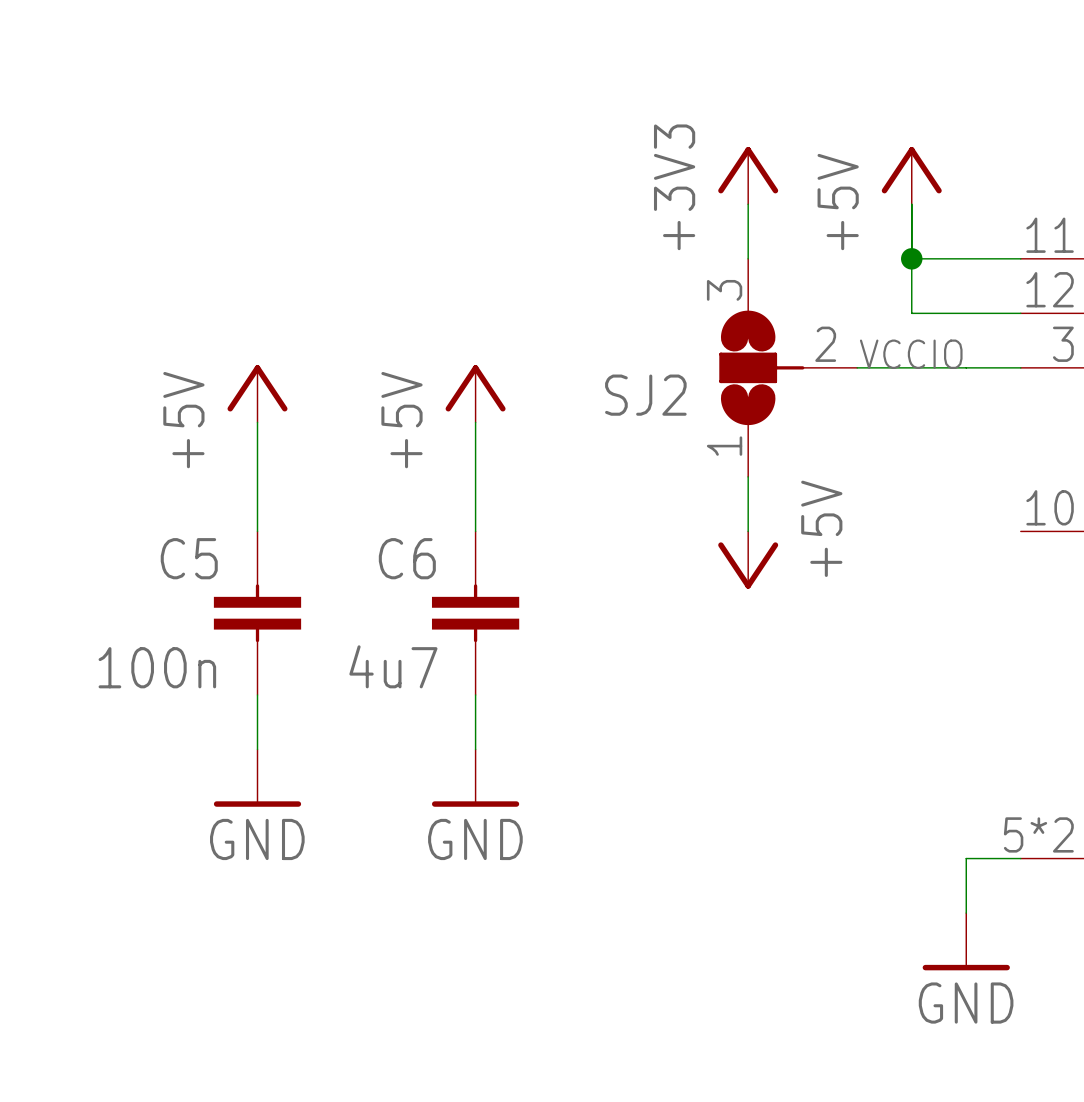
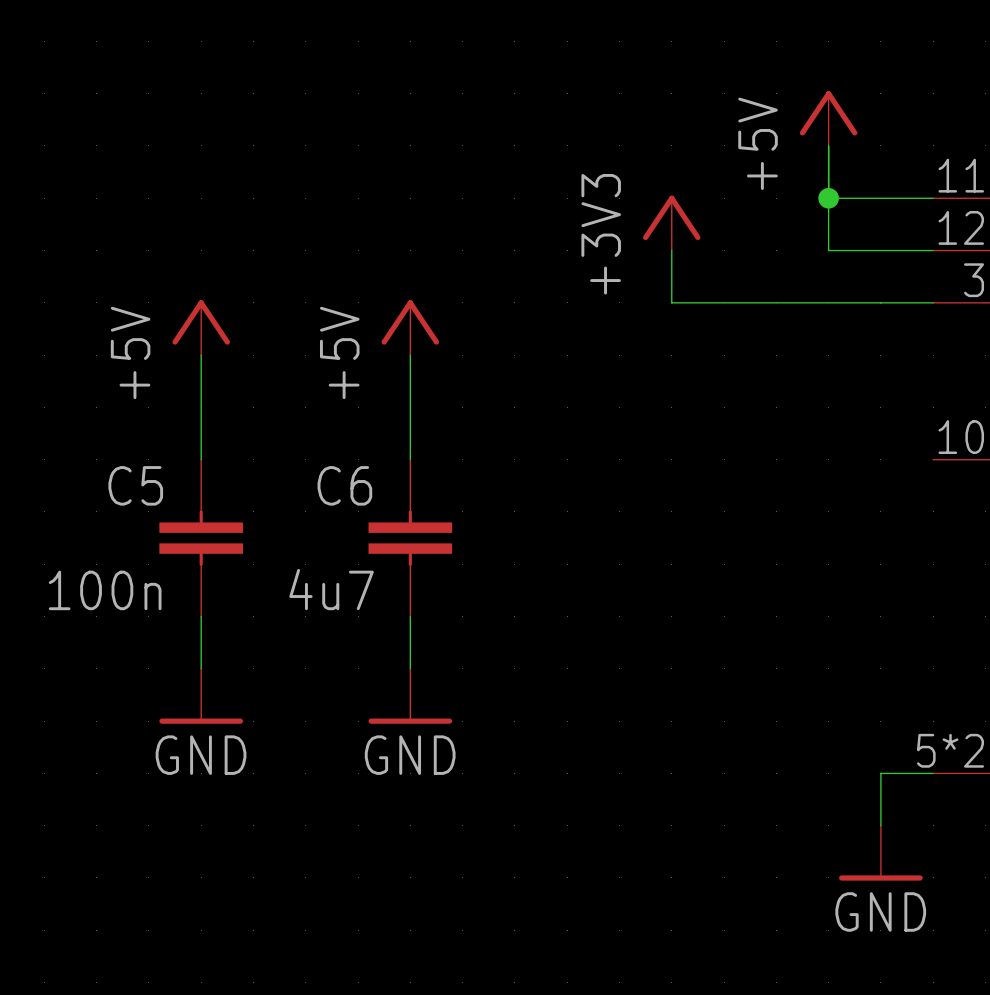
power symbol position: +3V3 (748, 175) -> +3V3 (671, 223)
wire: (748, 204) (748, 258) -> none
label: VCCIO (911, 354) -> none
SJ2: (788, 367) -> none
wire: (748, 476) (748, 531) -> none
power symbol: +5V (748, 560) -> none

